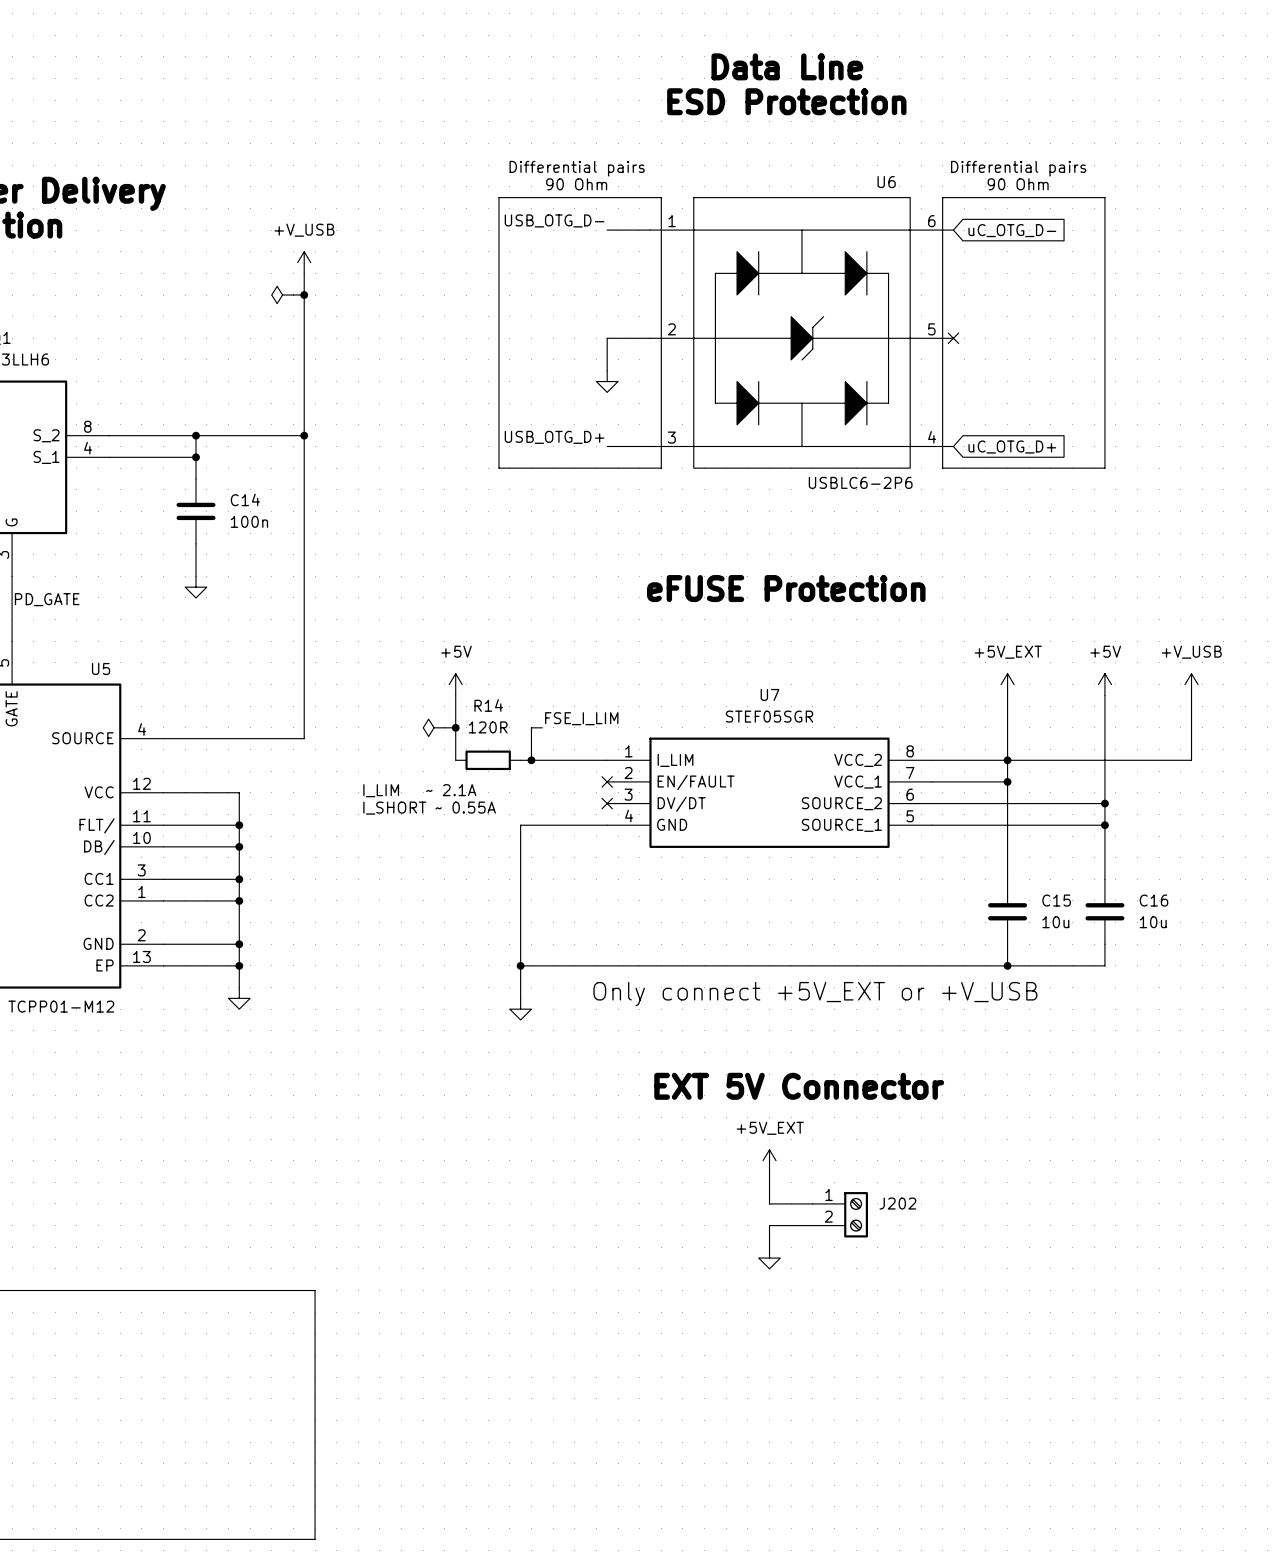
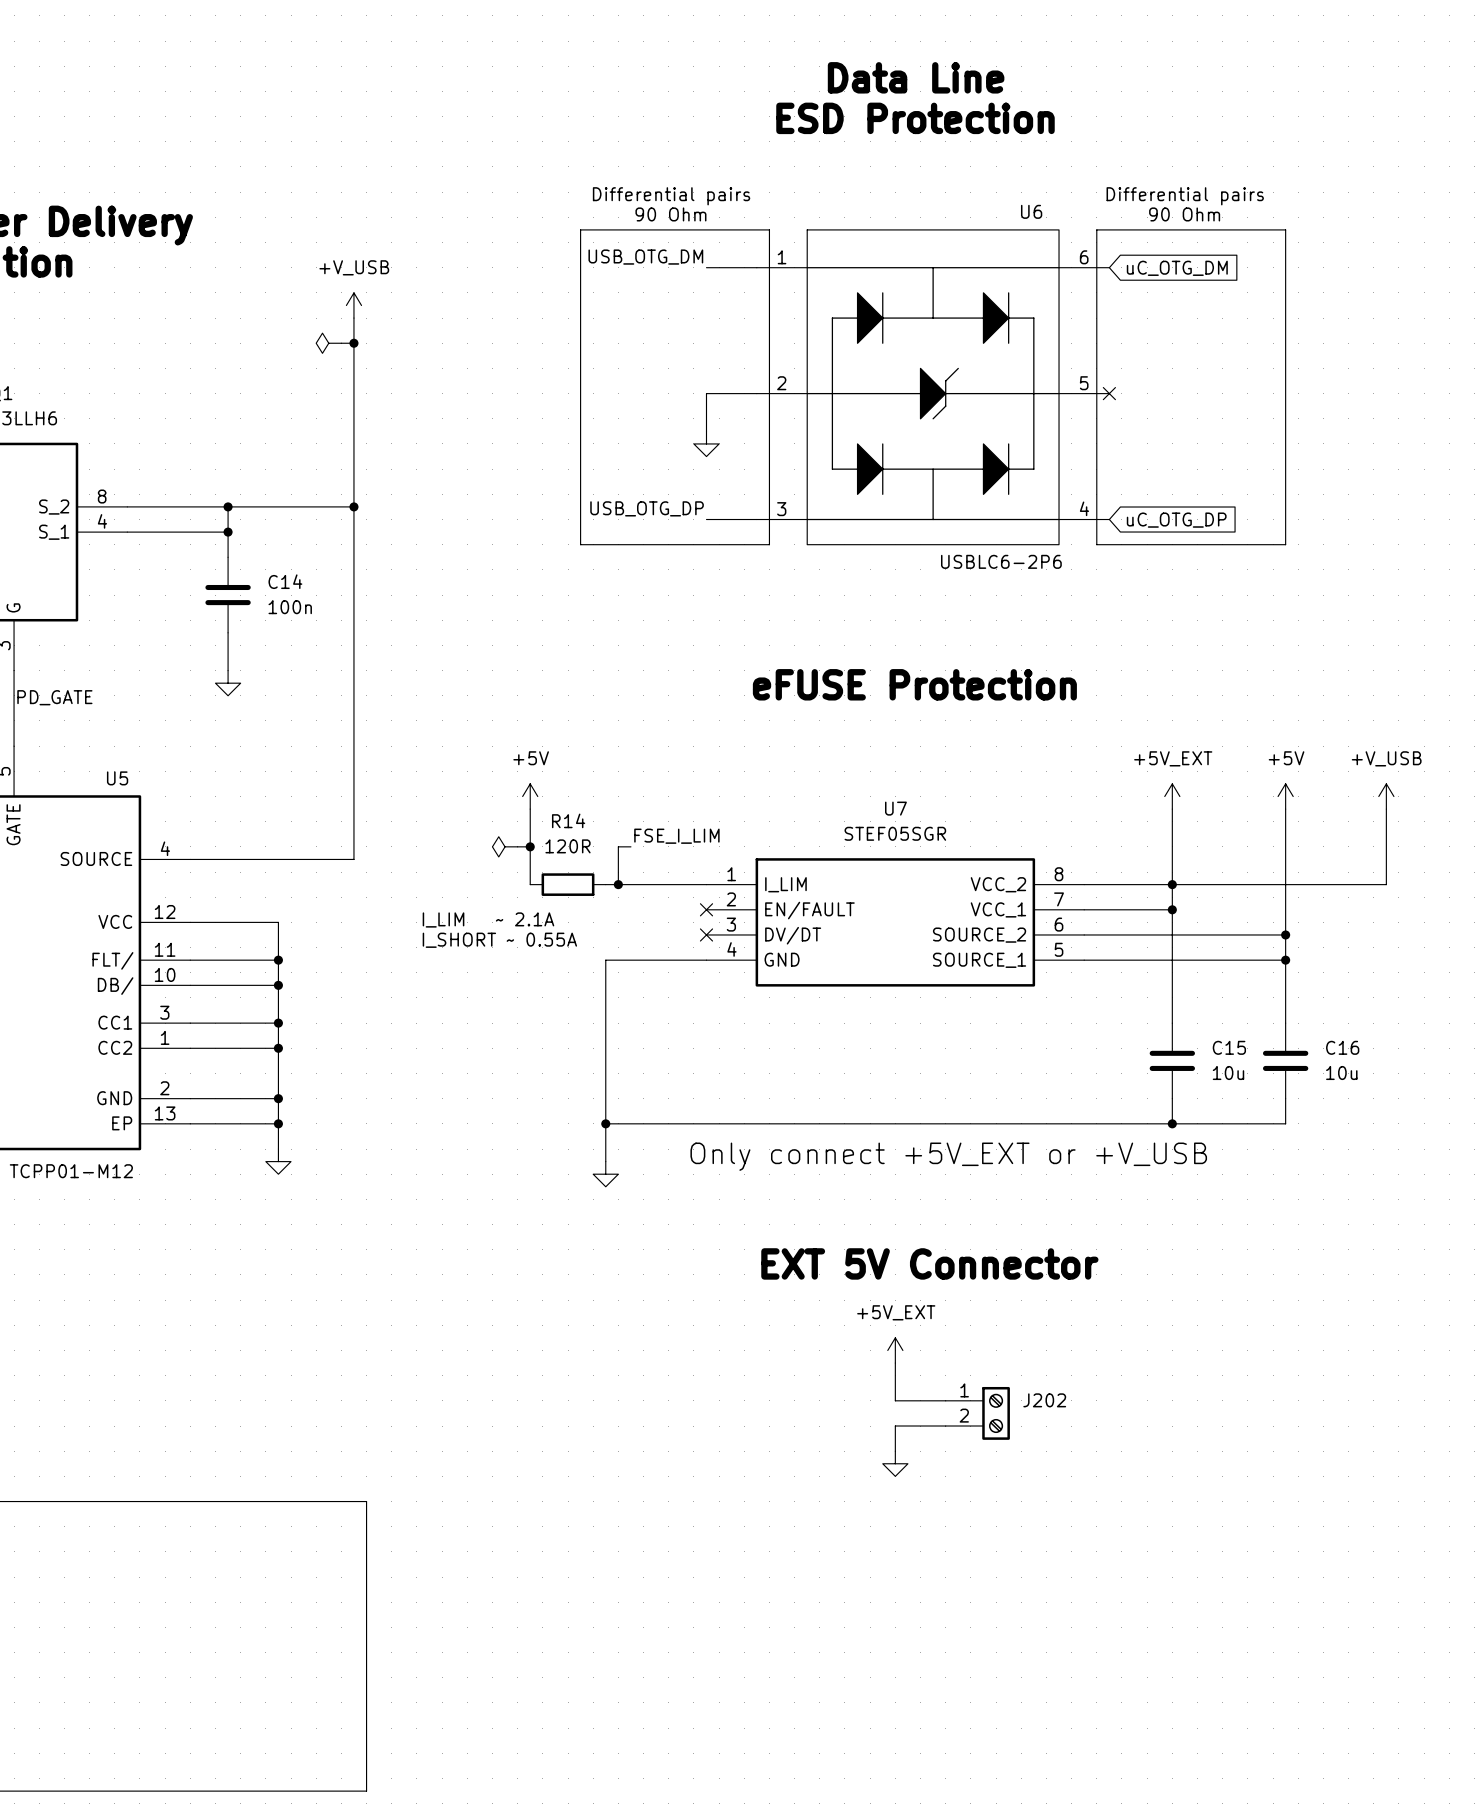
label: USB_OTG_D- (554, 220) -> USB_OTG_DM (645, 257)
global label: uC_OTG_D- (1012, 230) -> uC_OTG_DM (1177, 268)
label: USB_OTG_D+ (554, 437) -> USB_OTG_DP (647, 508)
global label: uC_OTG_D+ (1012, 447) -> uC_OTG_DP (1176, 520)

